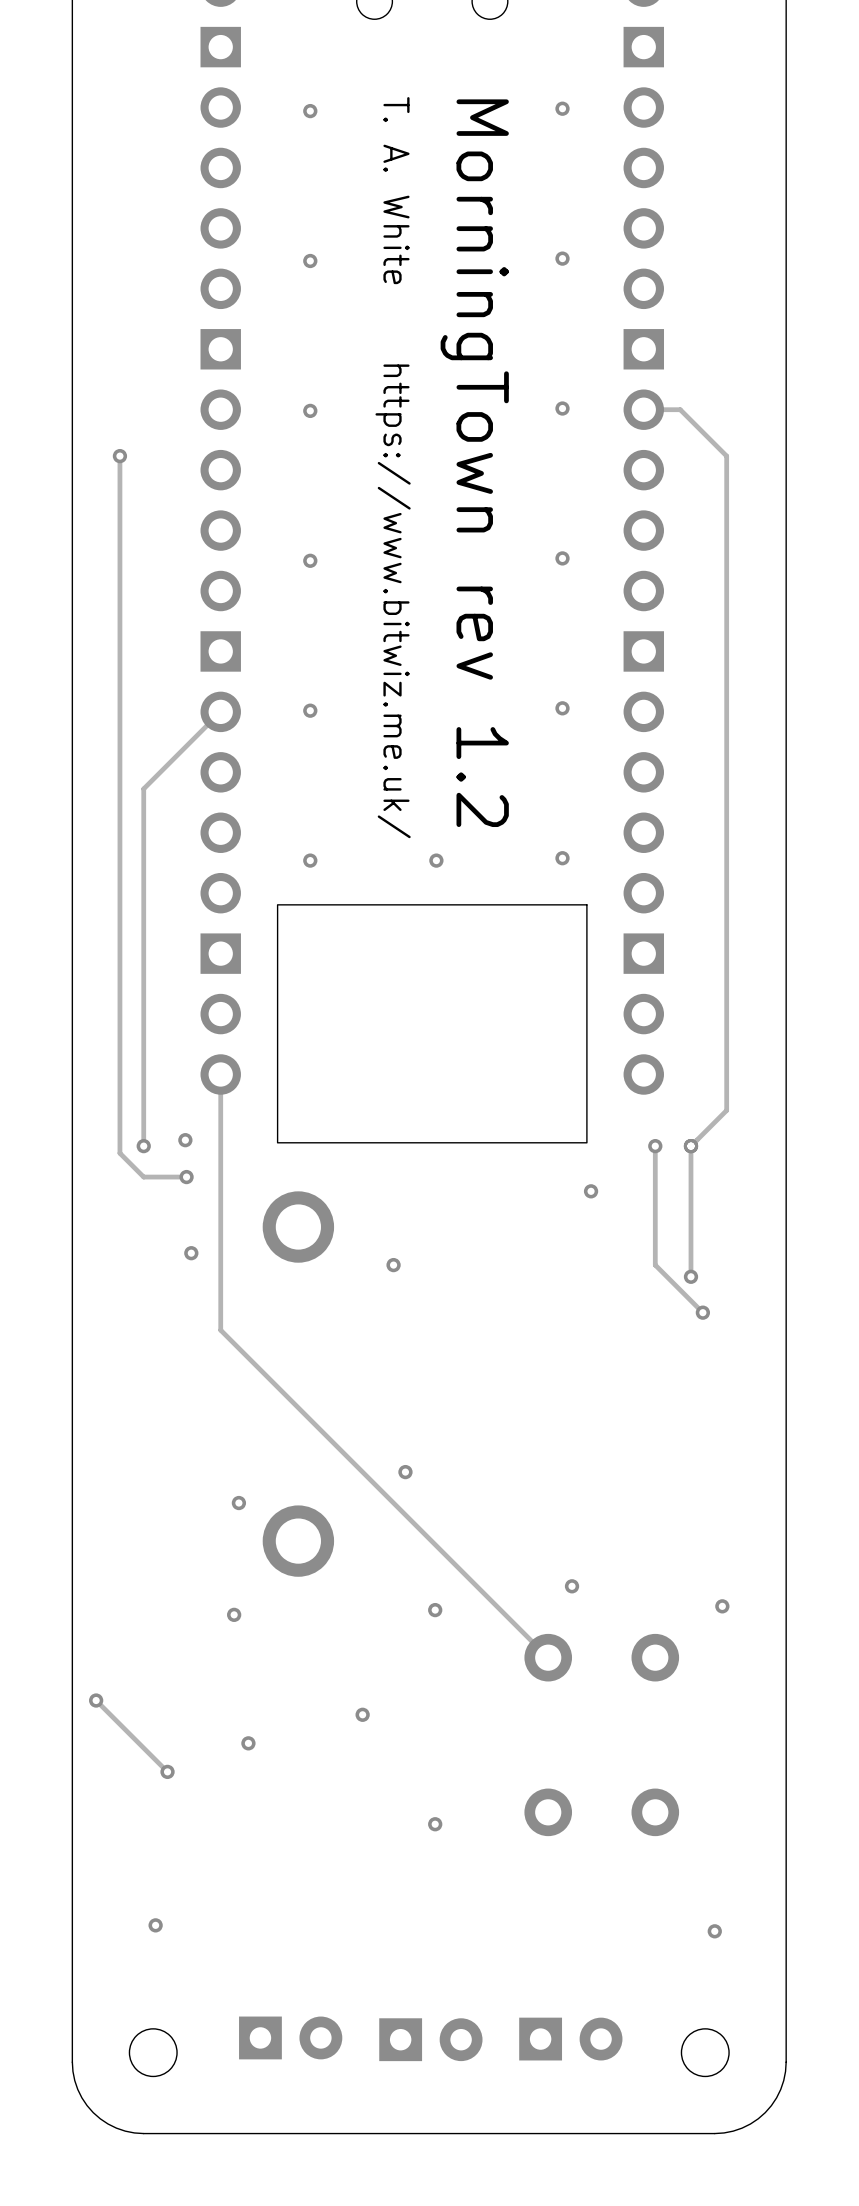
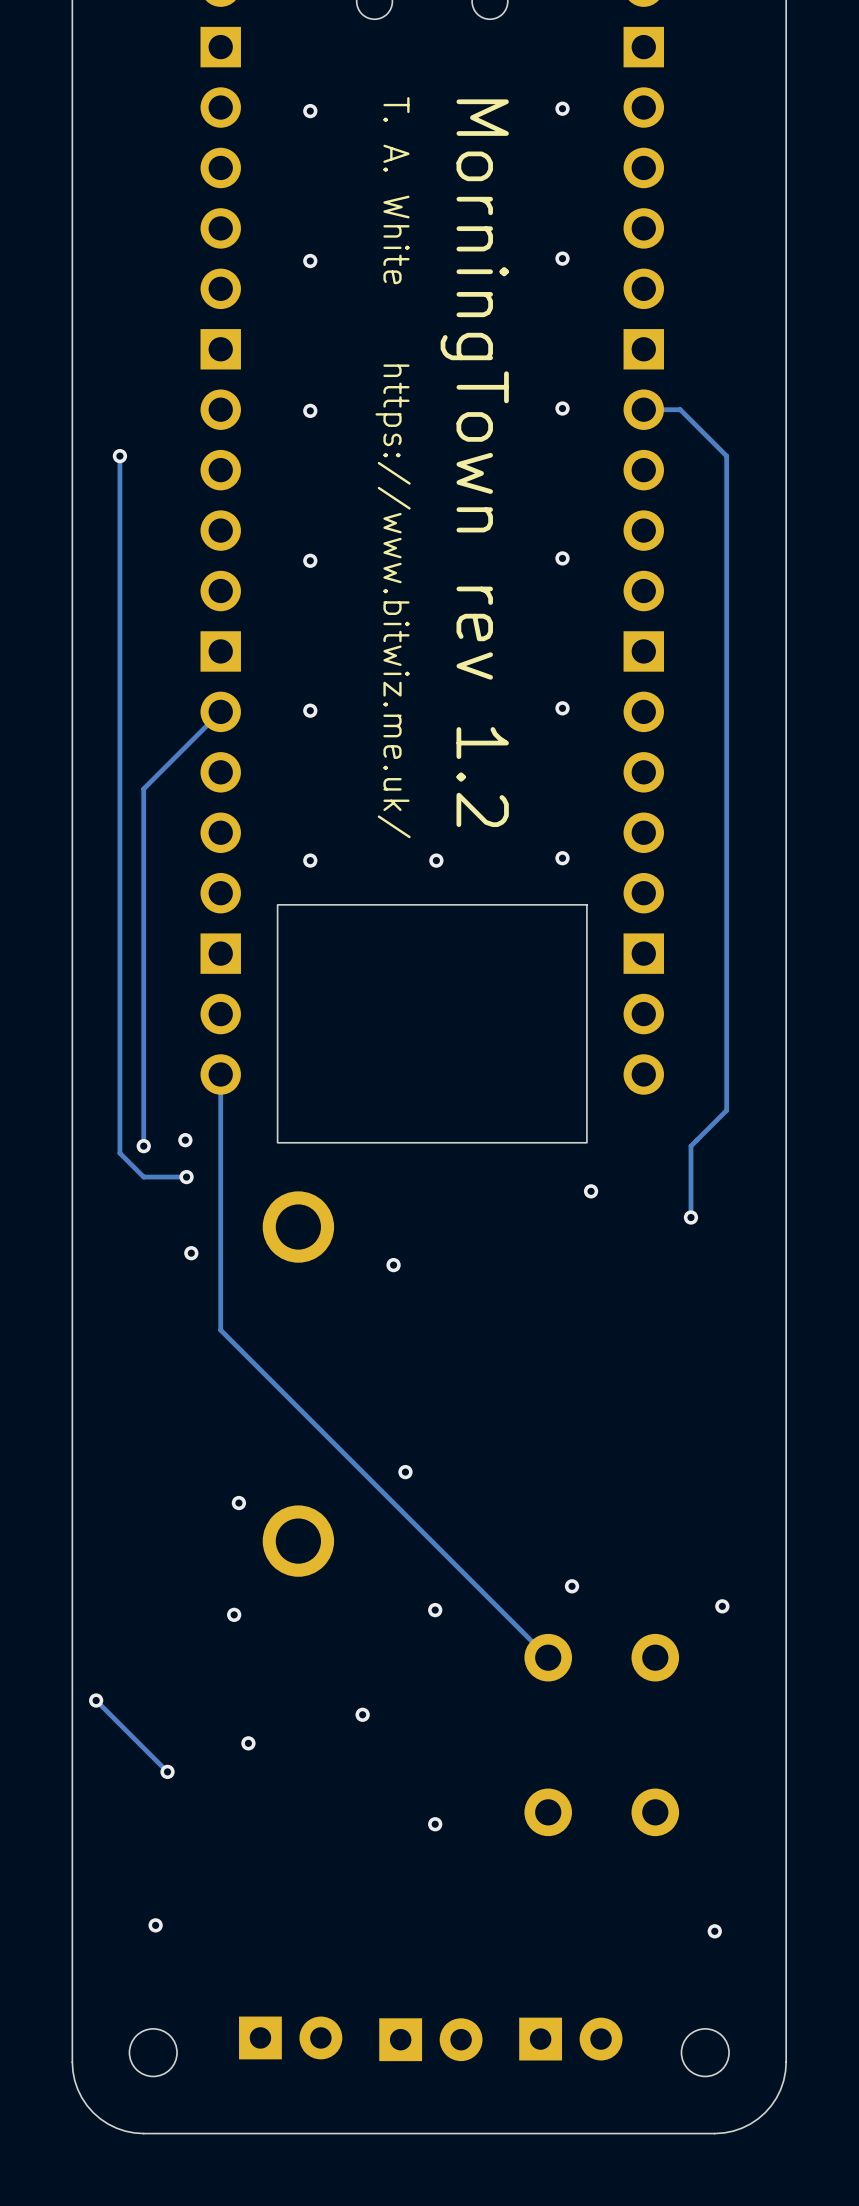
track: (655, 1146) (655, 1265) (702, 1312) -> none
via: (655, 1146) -> none
via: (690, 1146) -> none
track: (690, 1217) (690, 1276) -> none
via: none -> (690, 1217)
via: (690, 1276) -> none
via: (702, 1312) -> none

